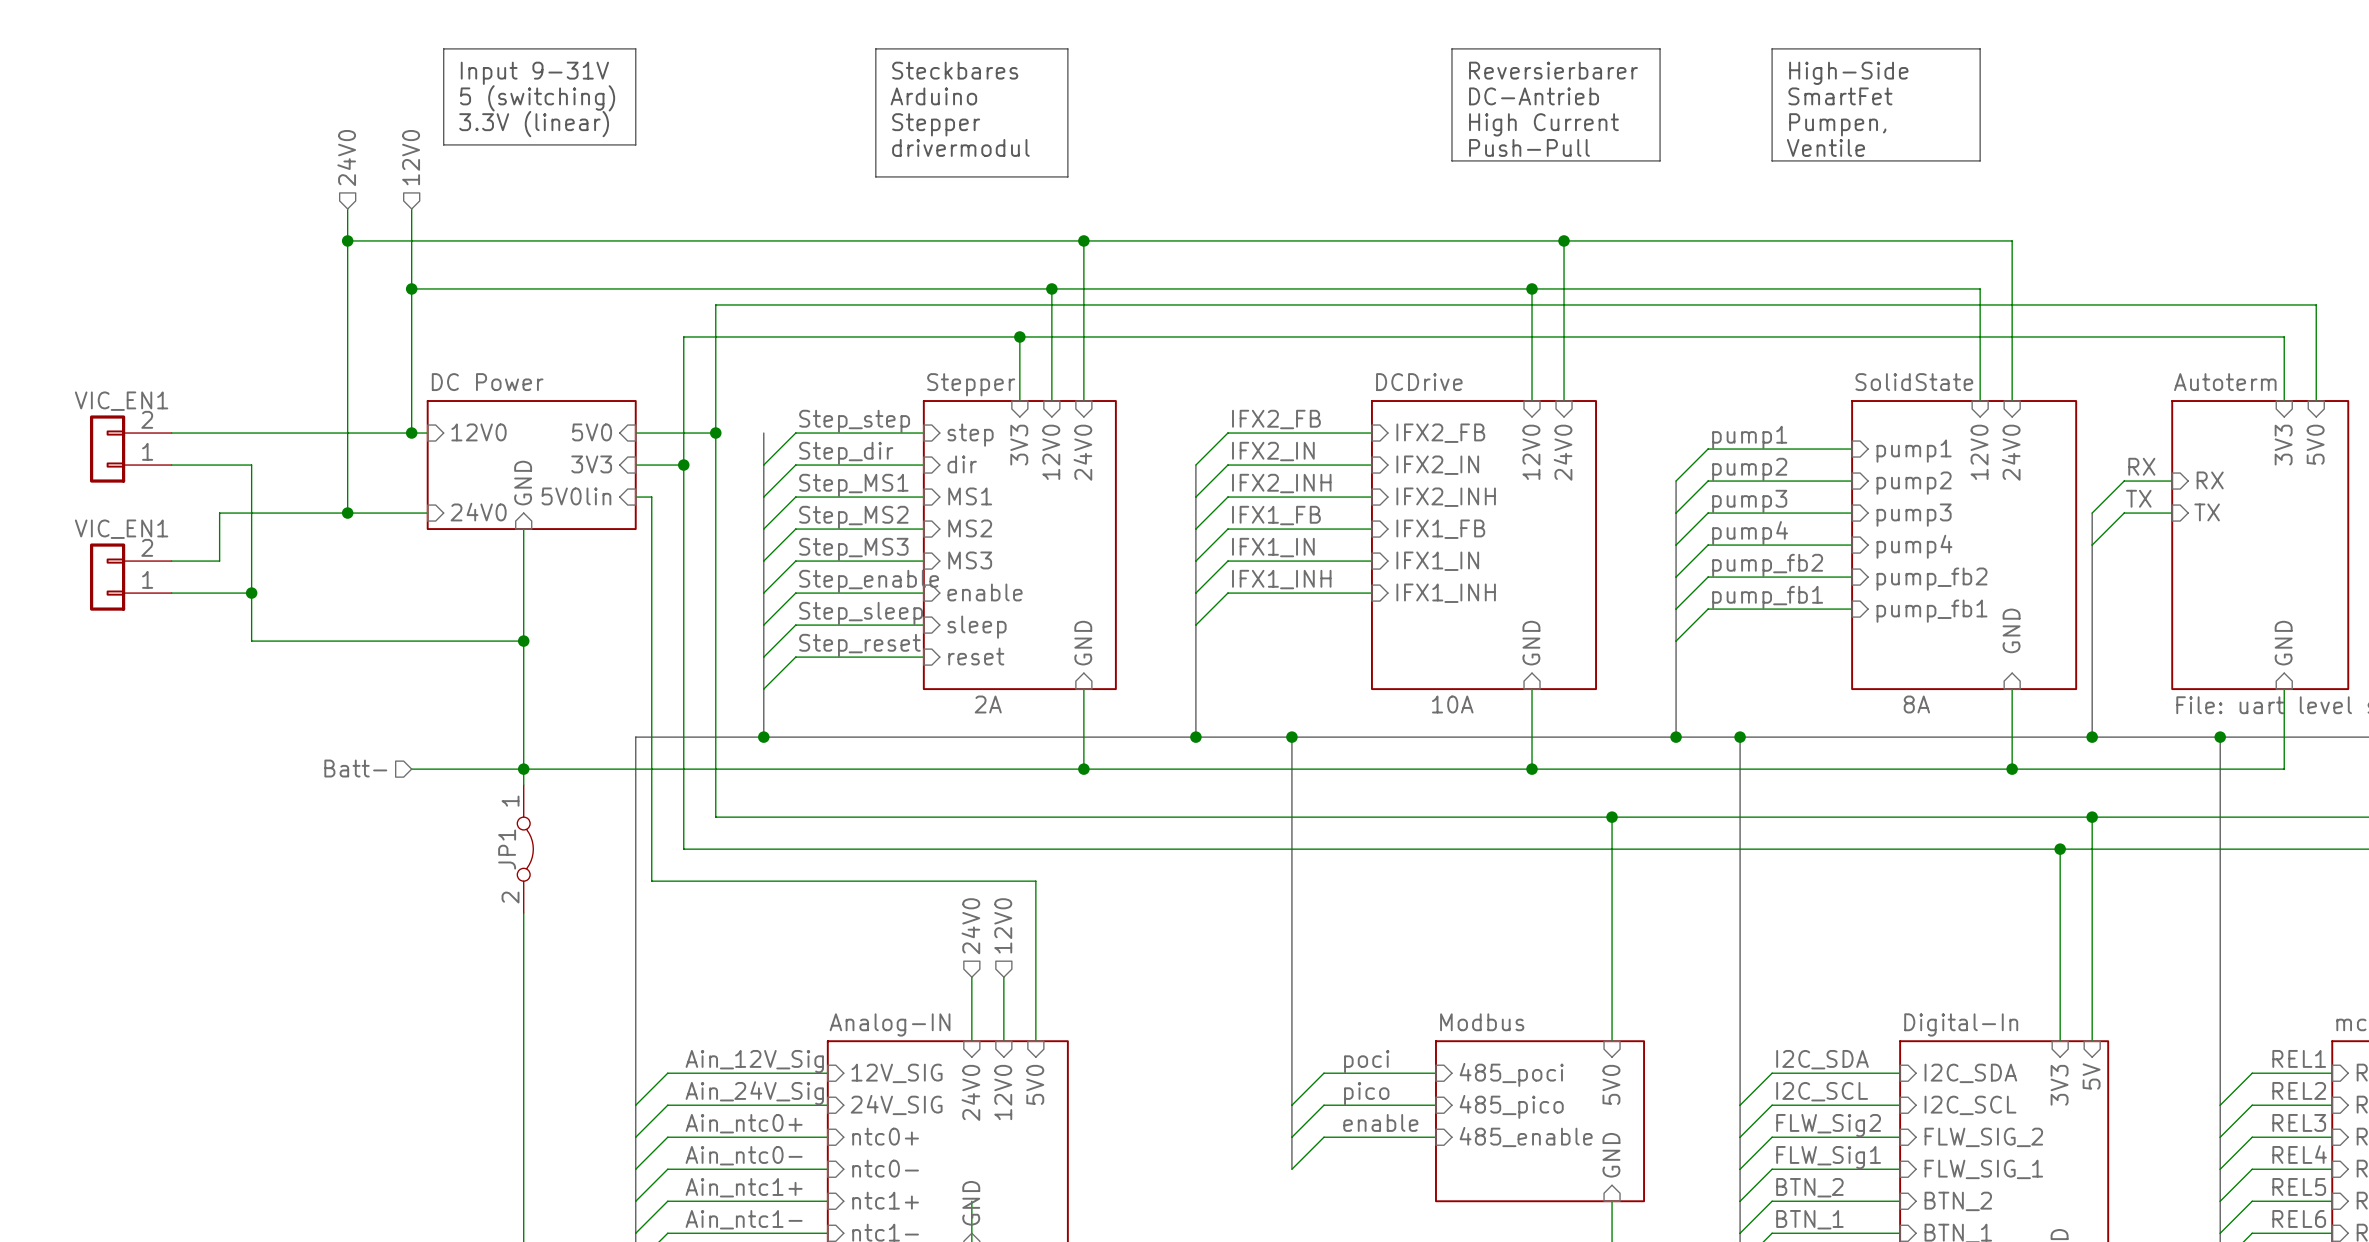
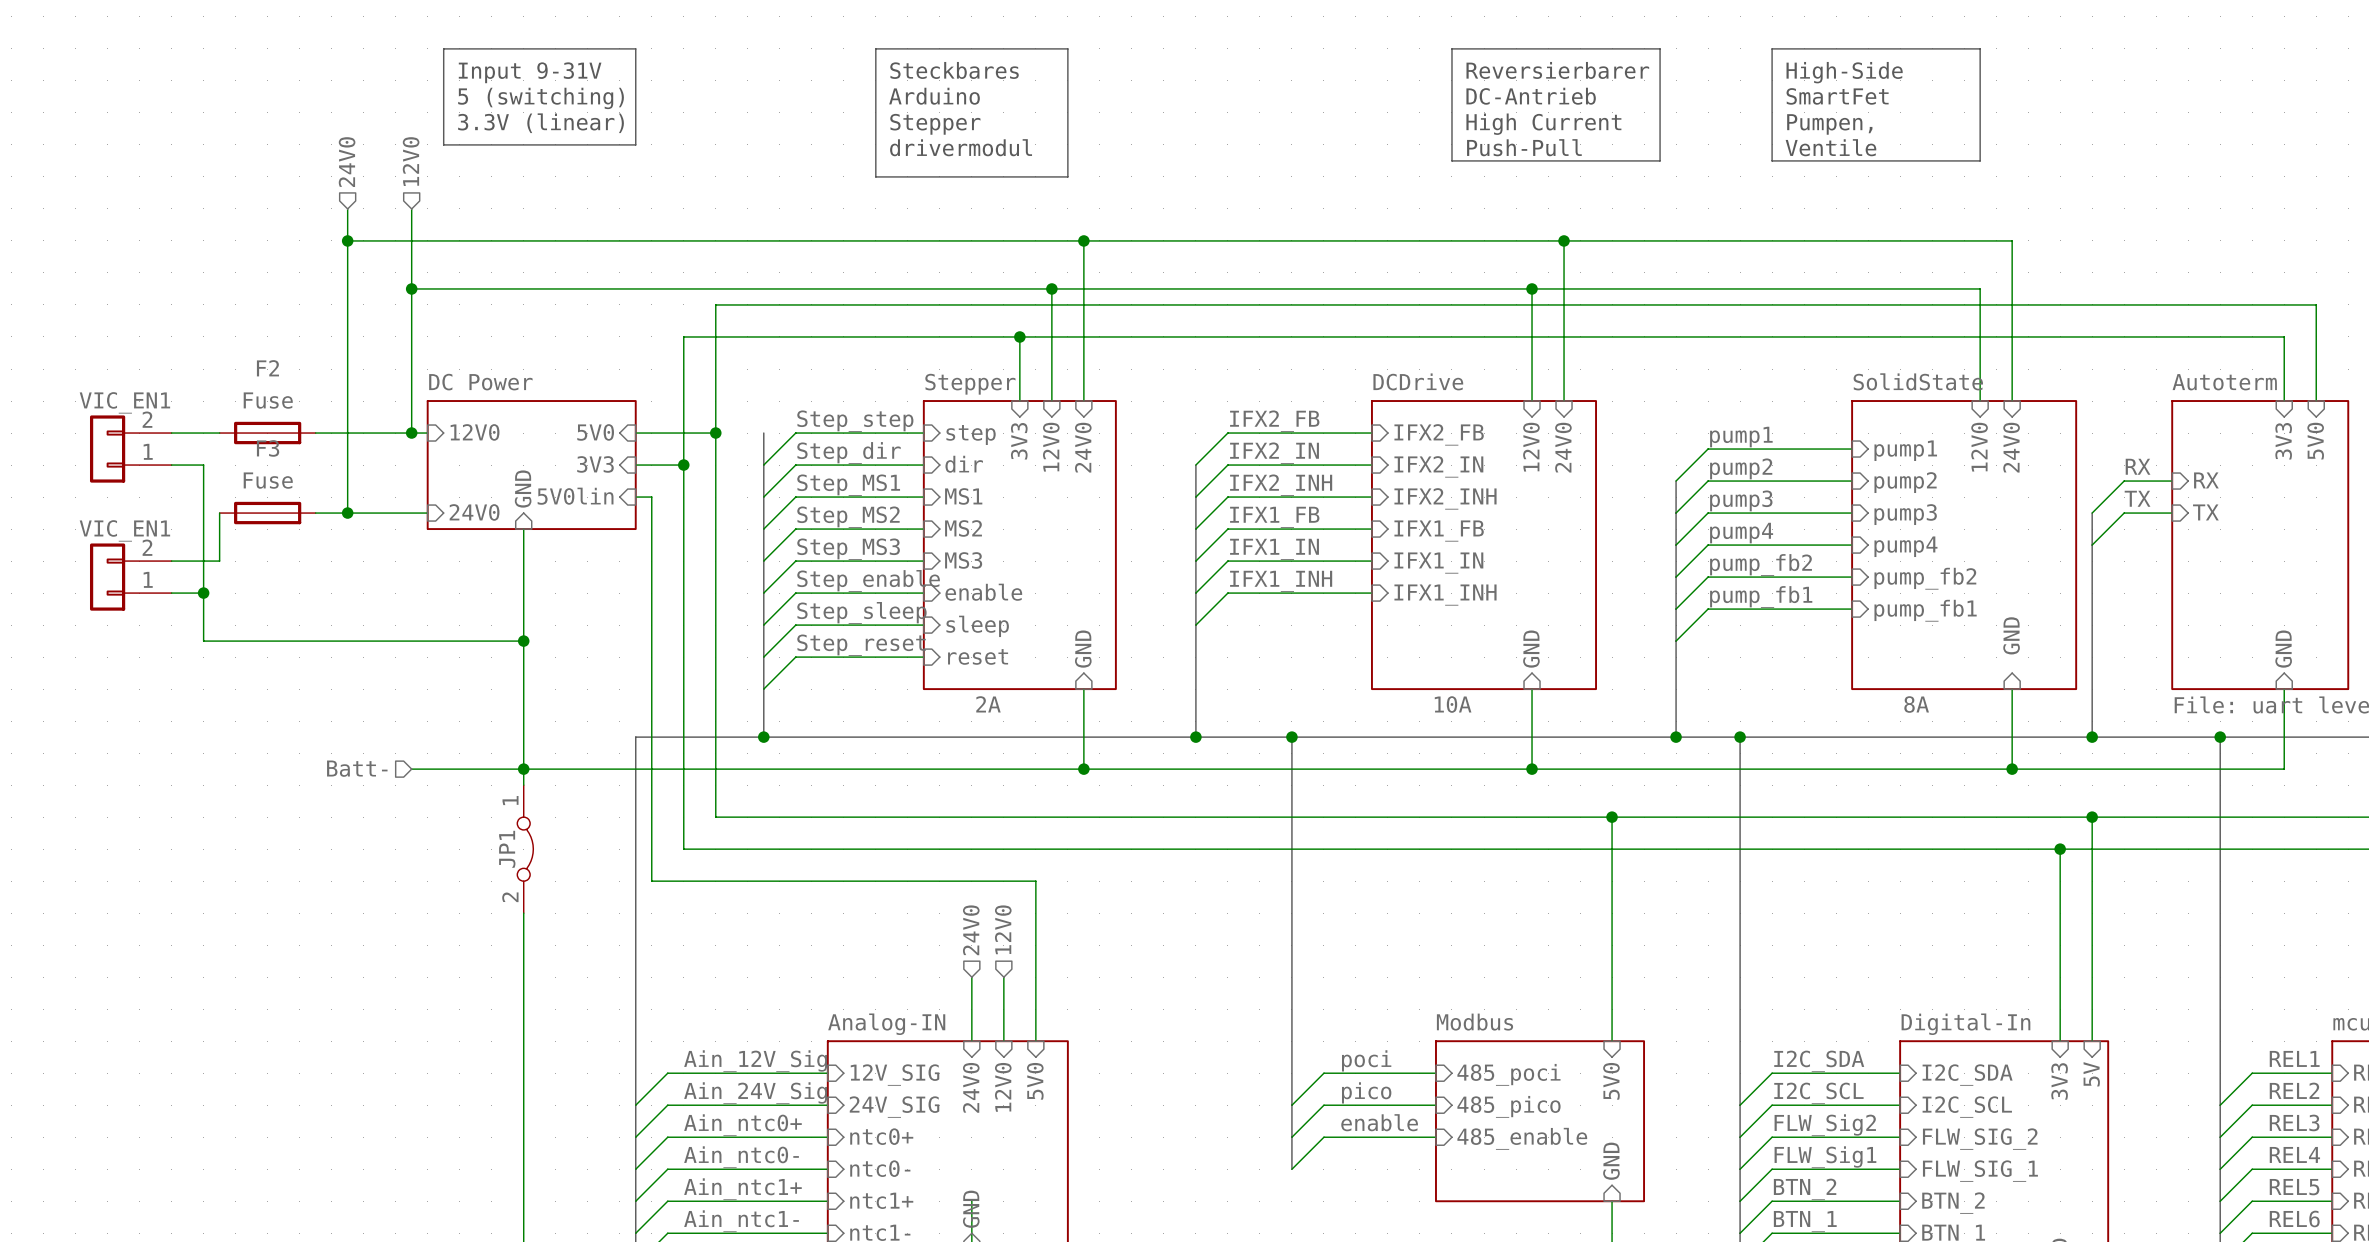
F2: none -> Fuse (267, 433)
wire: (203, 465) (251, 465) (251, 641) -> (203, 465) (203, 641) (251, 641)
F3: none -> Fuse (267, 513)
wire: (203, 593) (251, 593) -> none
junction position: (251, 593) -> (203, 593)

